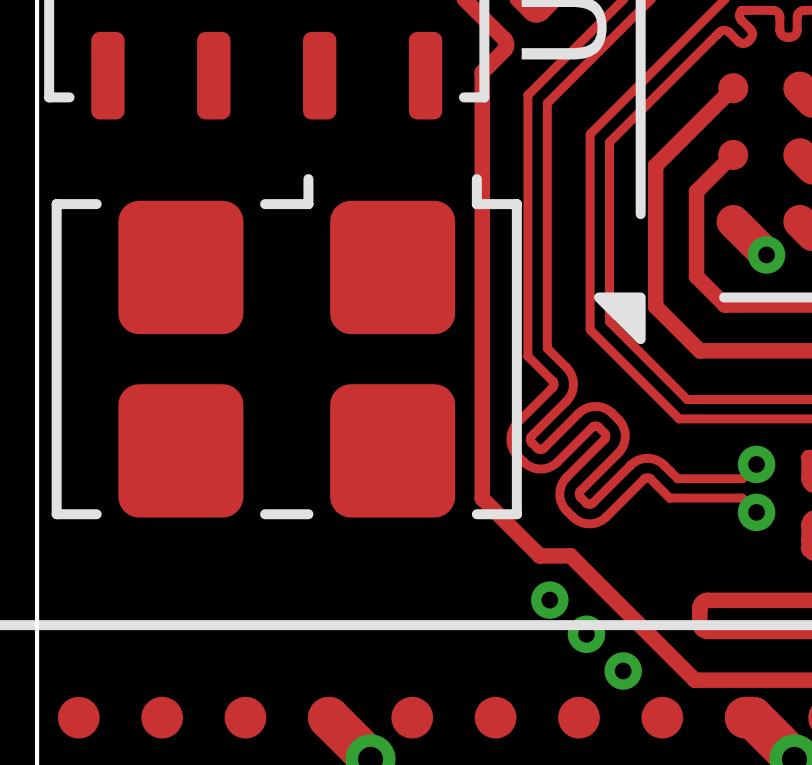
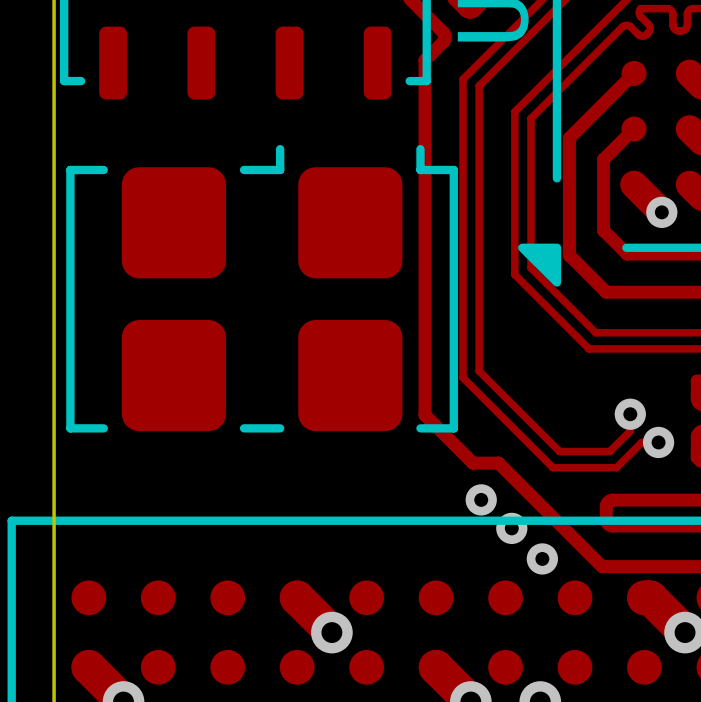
track: (547, 348) (569, 371) (573, 387) (568, 399) (531, 436) (531, 442) (538, 449) (542, 449) (580, 411) (592, 406) (603, 407) (610, 411) (620, 421) (624, 430) (624, 441) (620, 451) (579, 492) (579, 496) (587, 503) (592, 503) (630, 465) (642, 458) (650, 458) (660, 461) (677, 478) (742, 478) (756, 464) -> (479, 290) (479, 371) (559, 451) (609, 451) (630, 431) (630, 414)
track: (527, 356) (552, 381) (554, 384) (513, 428) (511, 444) (517, 456) (531, 467) (546, 468) (557, 462) (593, 426) (598, 426) (605, 434) (604, 439) (566, 477) (561, 486) (559, 494) (562, 504) (575, 518) (586, 523) (601, 520) (647, 477) (669, 498) (742, 498) (756, 512) -> (463, 296) (463, 377) (552, 467) (616, 467) (641, 442) (658, 442)
via: (756, 464) -> none
via: none -> (630, 414)
via: (756, 512) -> none
via: none -> (658, 442)

